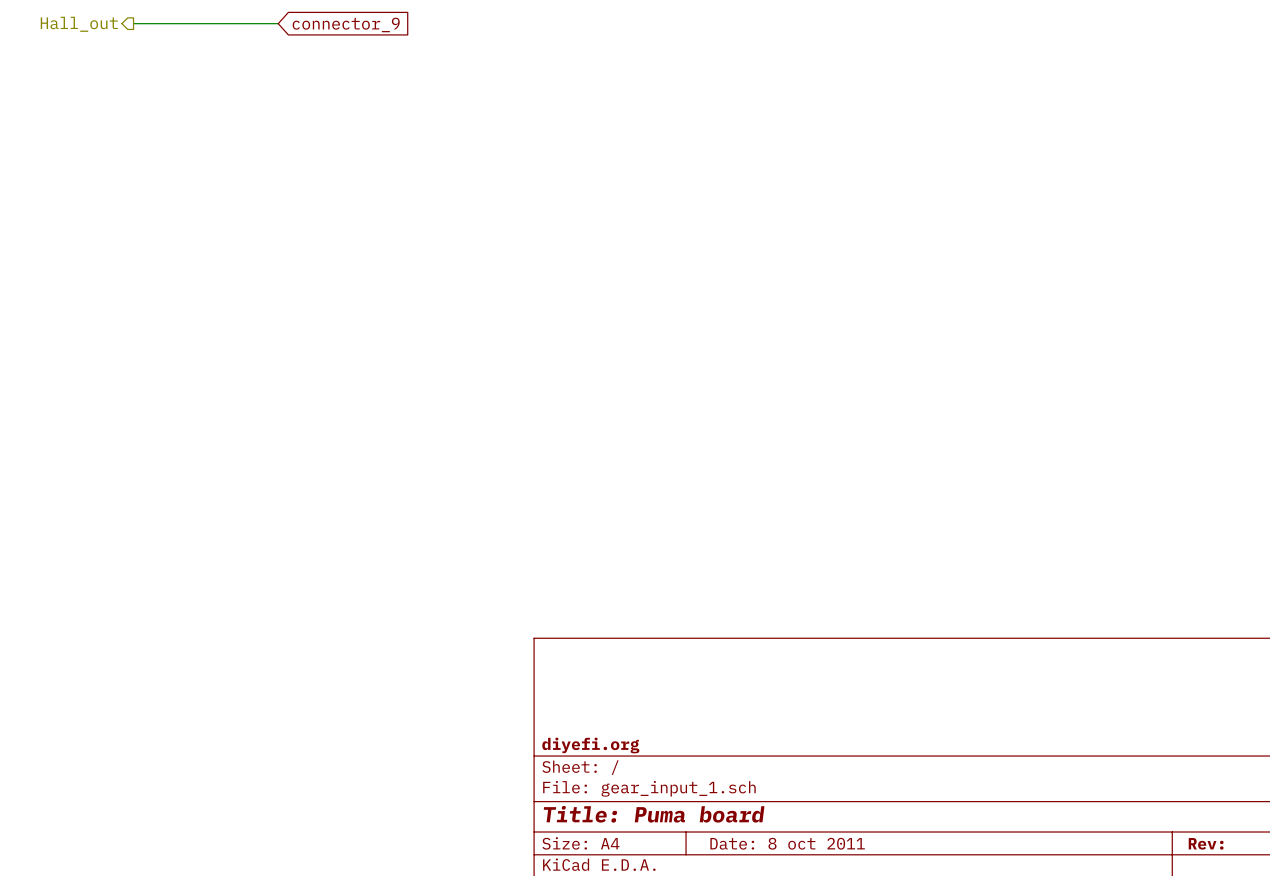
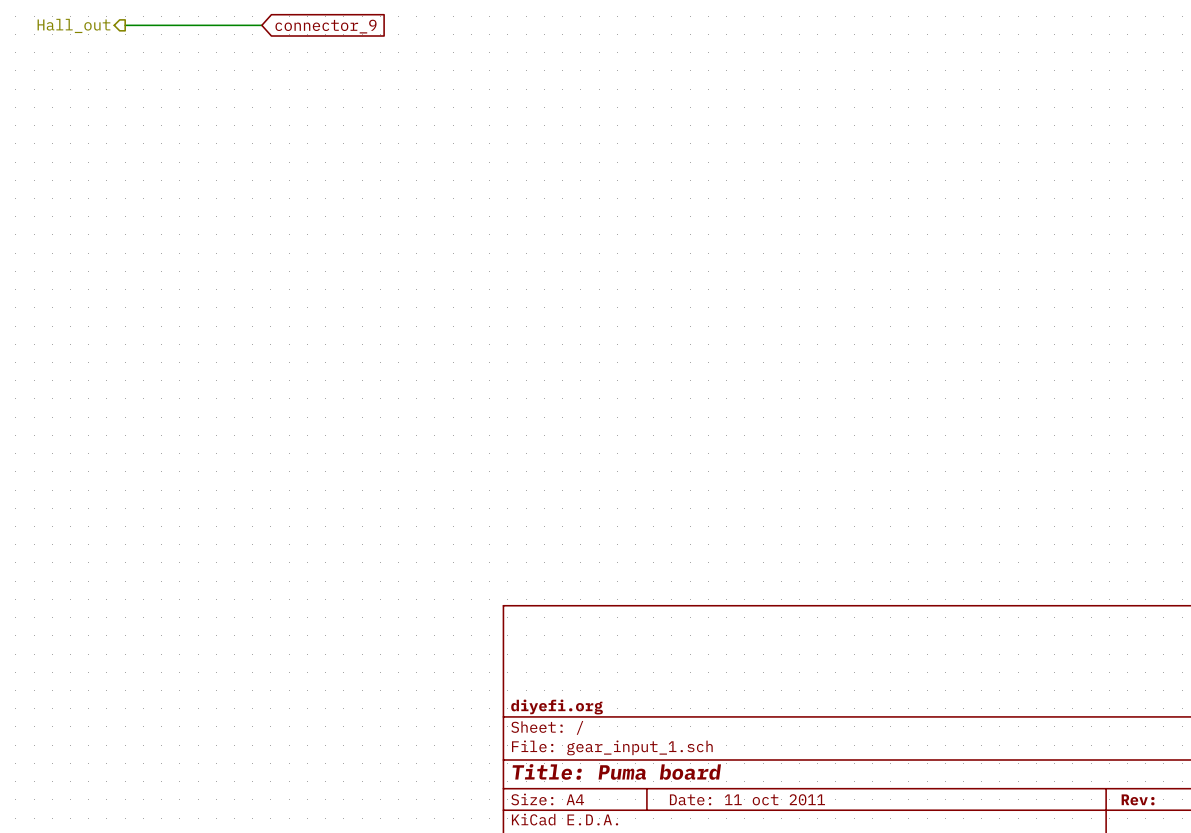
title block: Date: 8 oct 2011 (787, 843) -> Date: 11 oct 2011 (747, 799)

